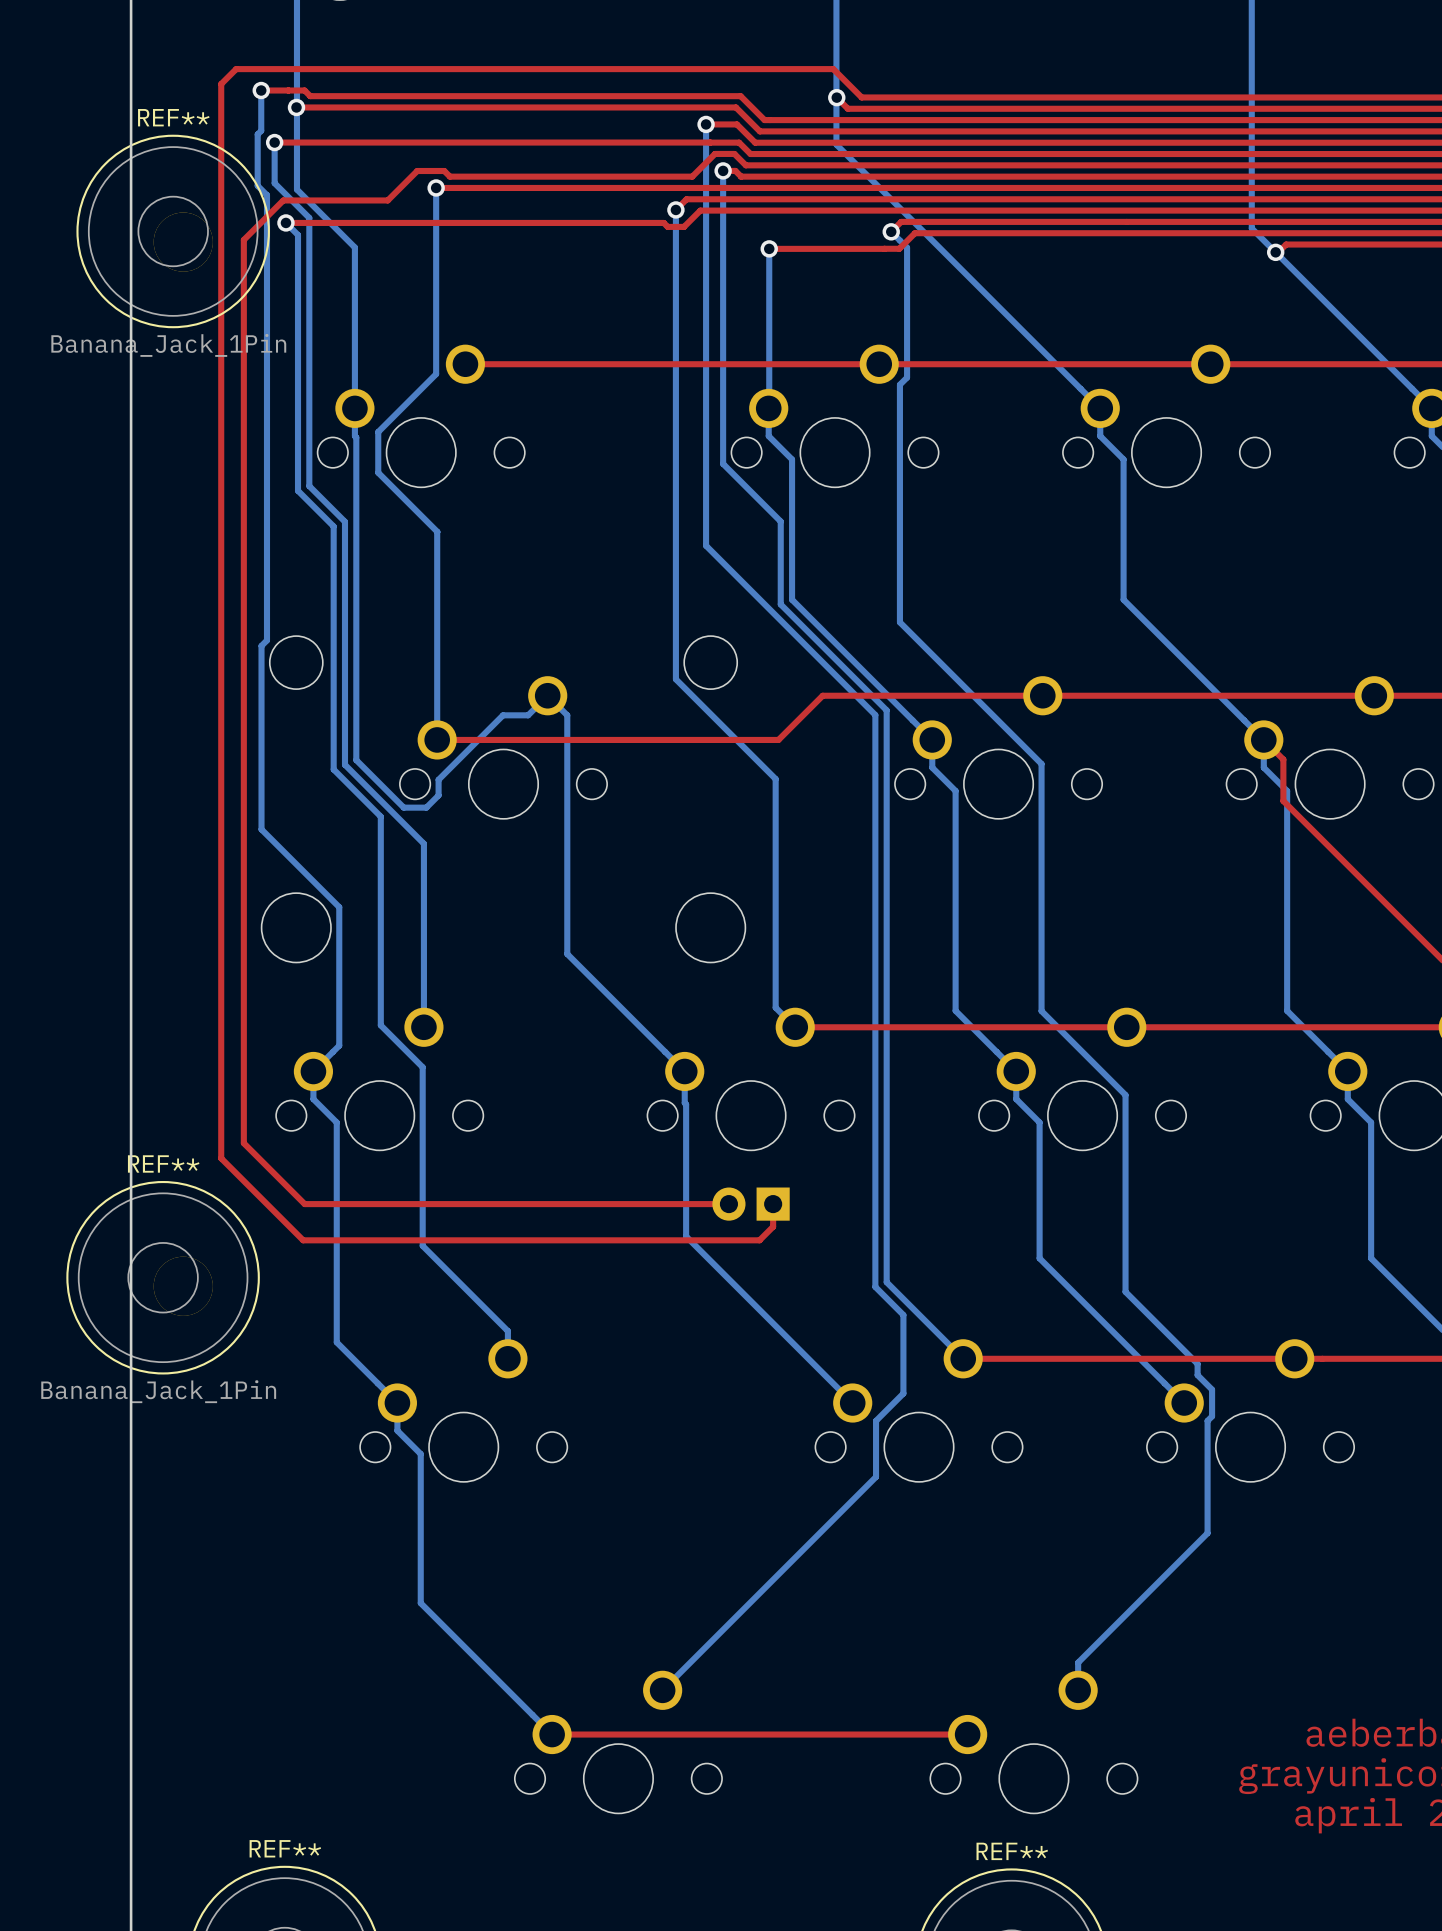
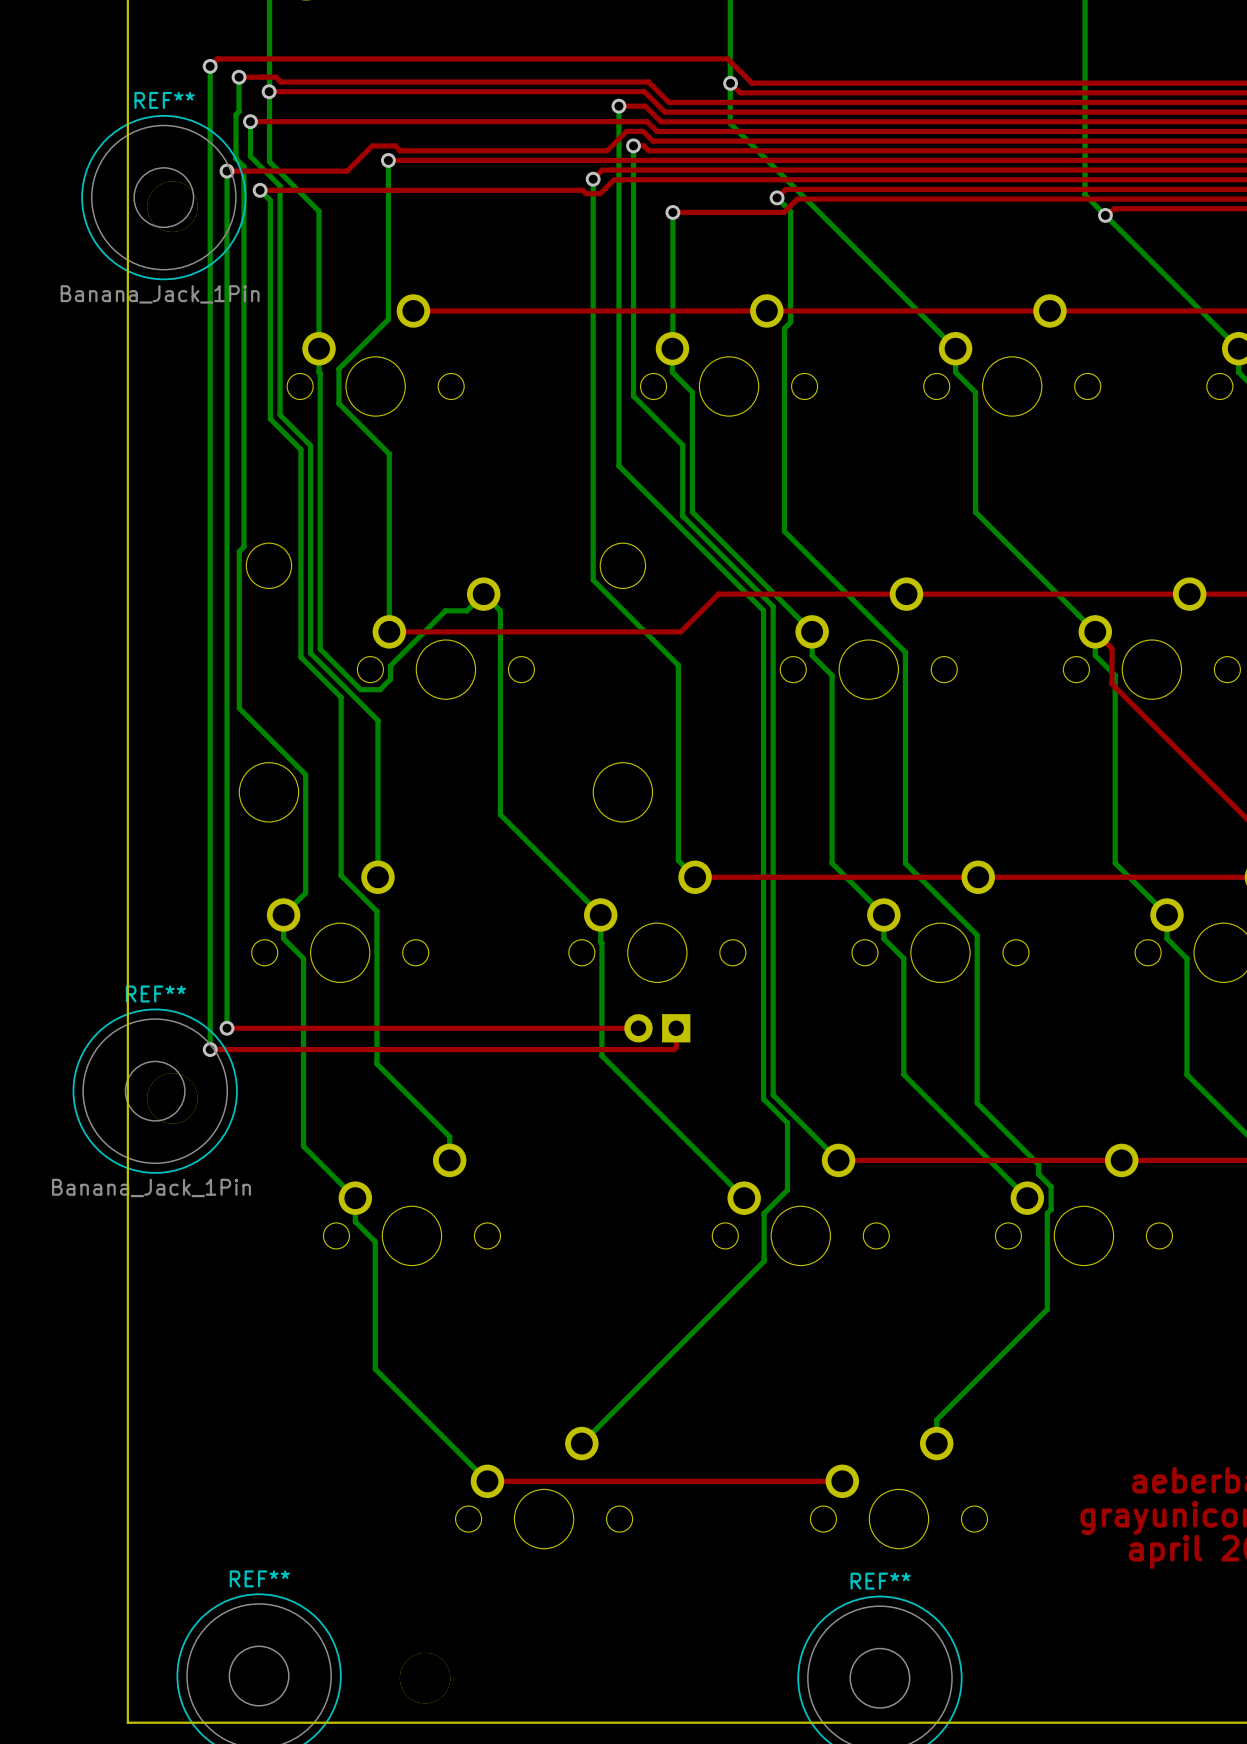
bottom track: none -> (210, 66) (210, 1049)
top track: (227, 77) (221, 84) (221, 1158) (303, 1240) (759, 1240) (770, 1229) -> (210, 1049) (674, 1049)
via: none -> (210, 66)
bottom track: none -> (227, 171) (227, 1028)
top track: none -> (227, 171) (257, 171)
via: none -> (227, 171)
top track: (283, 200) (243, 239) (243, 1143) (304, 1204) -> (227, 1028) (276, 1028)
via: none -> (227, 1028)
via: none -> (210, 1049)

